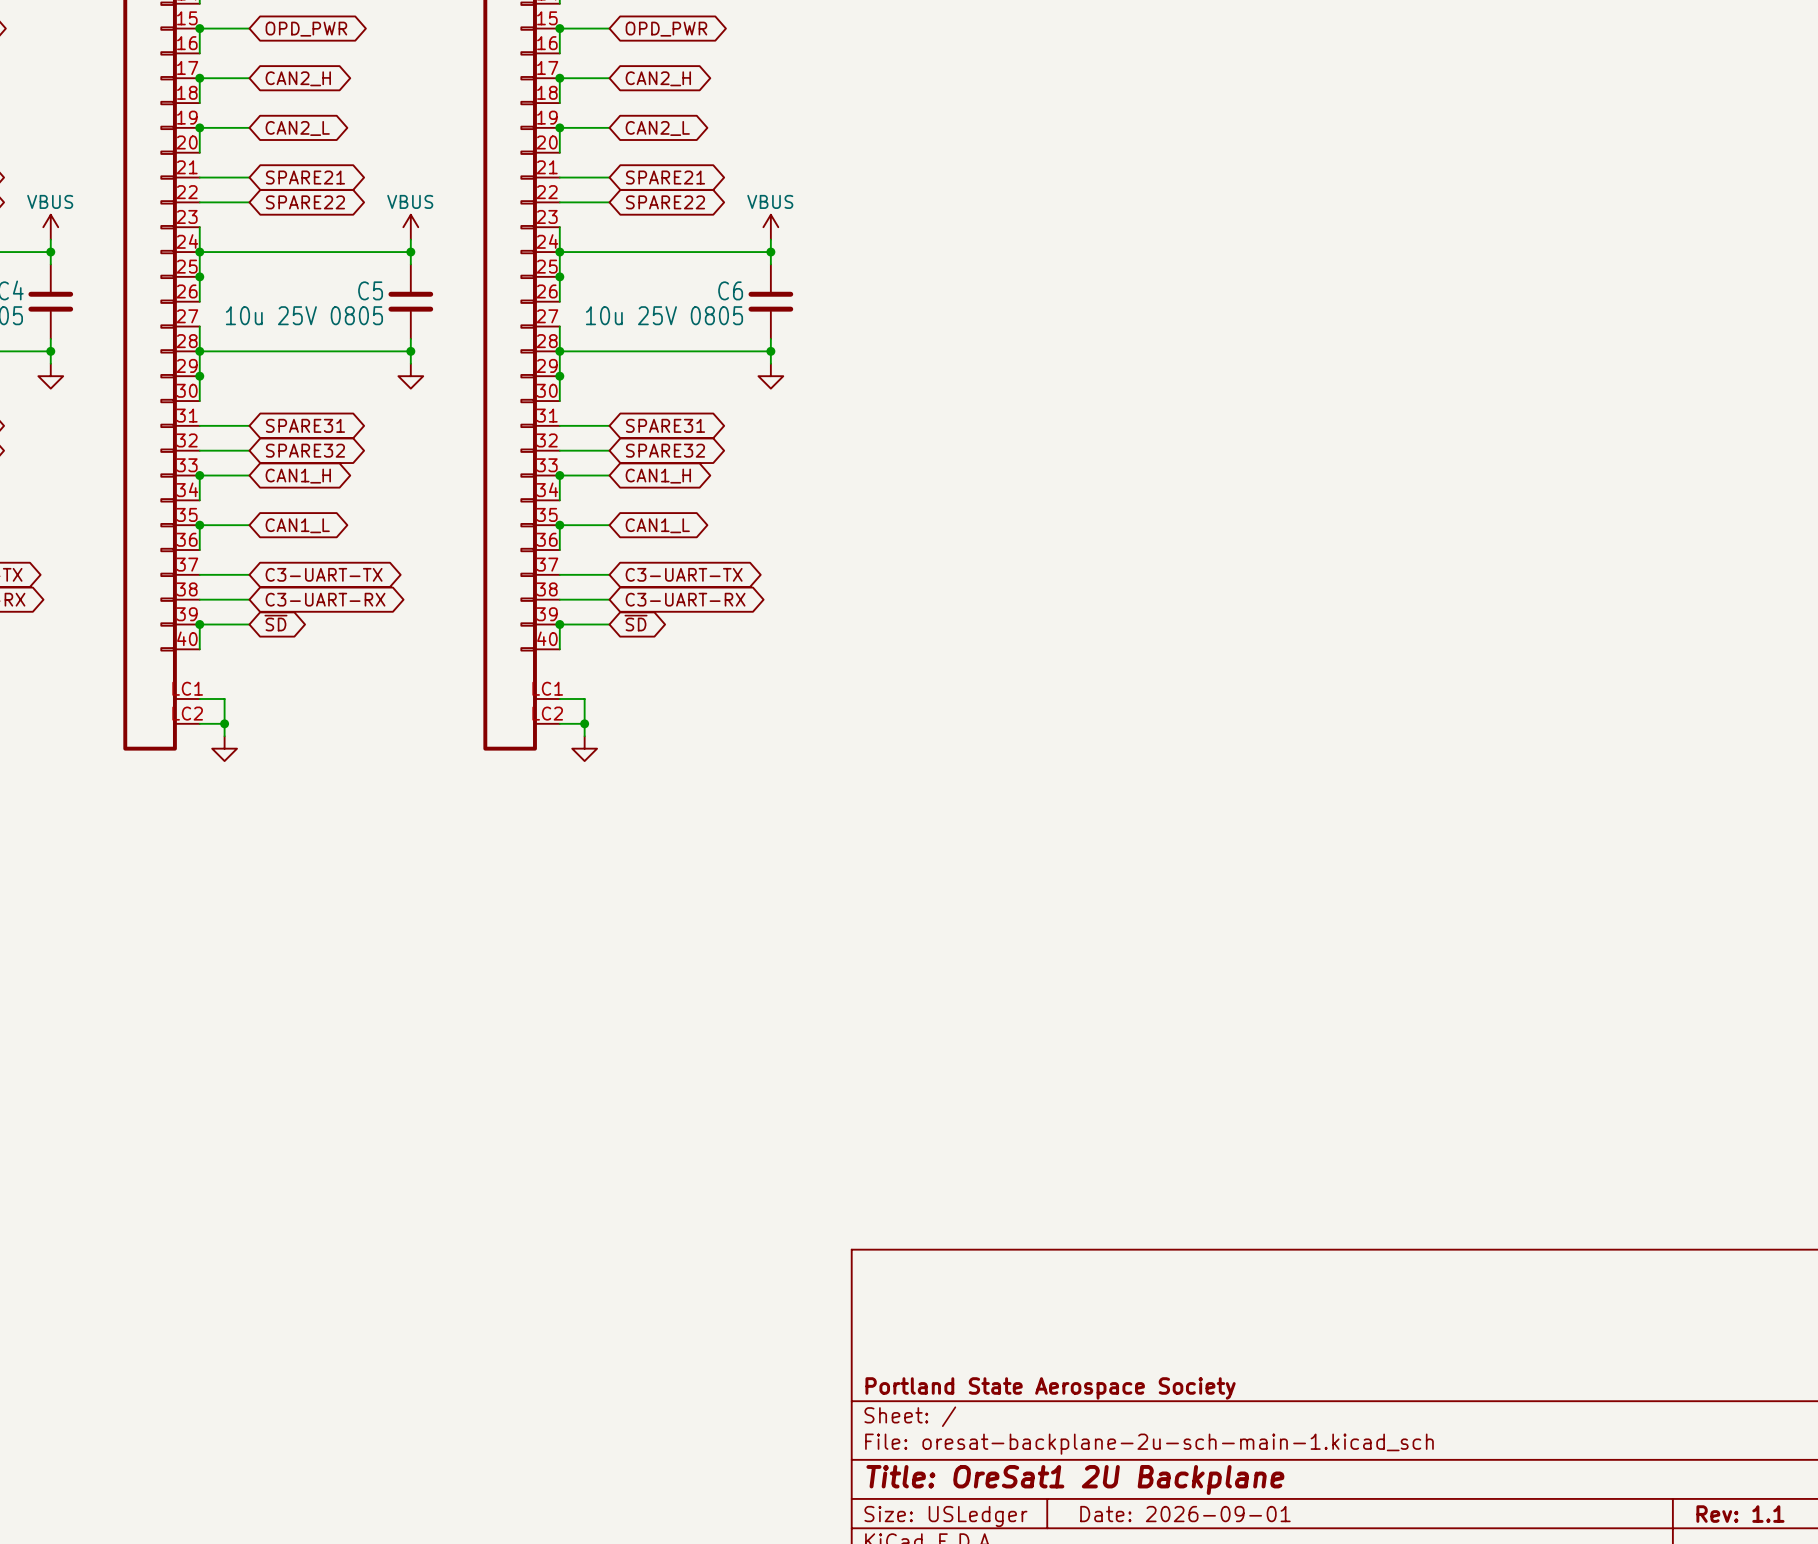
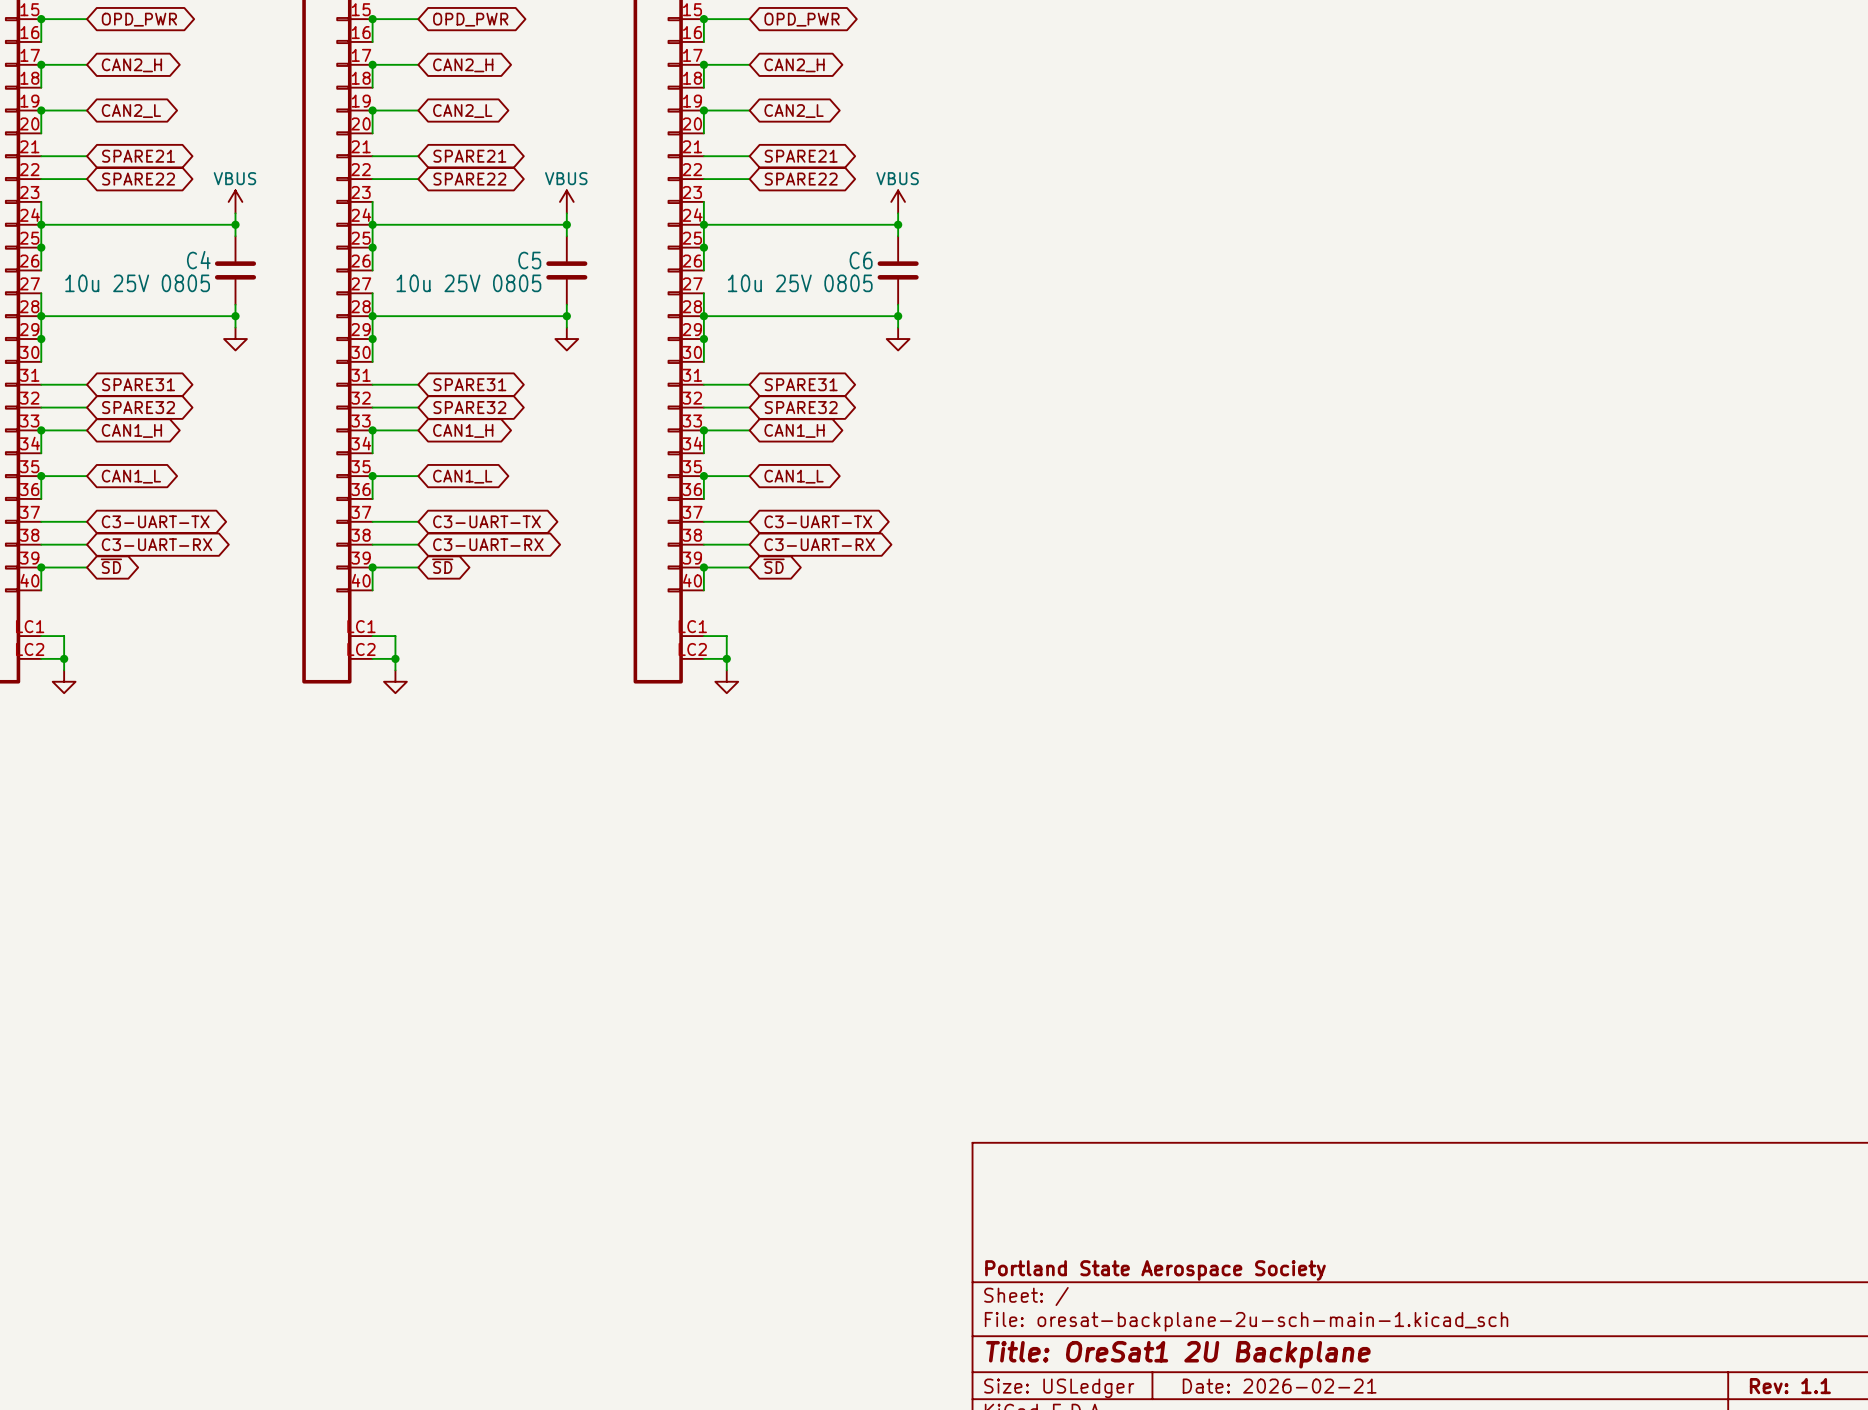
title block: Date: 2026-09-01 (1185, 1514) -> Date: 2026-02-21 (1279, 1386)

